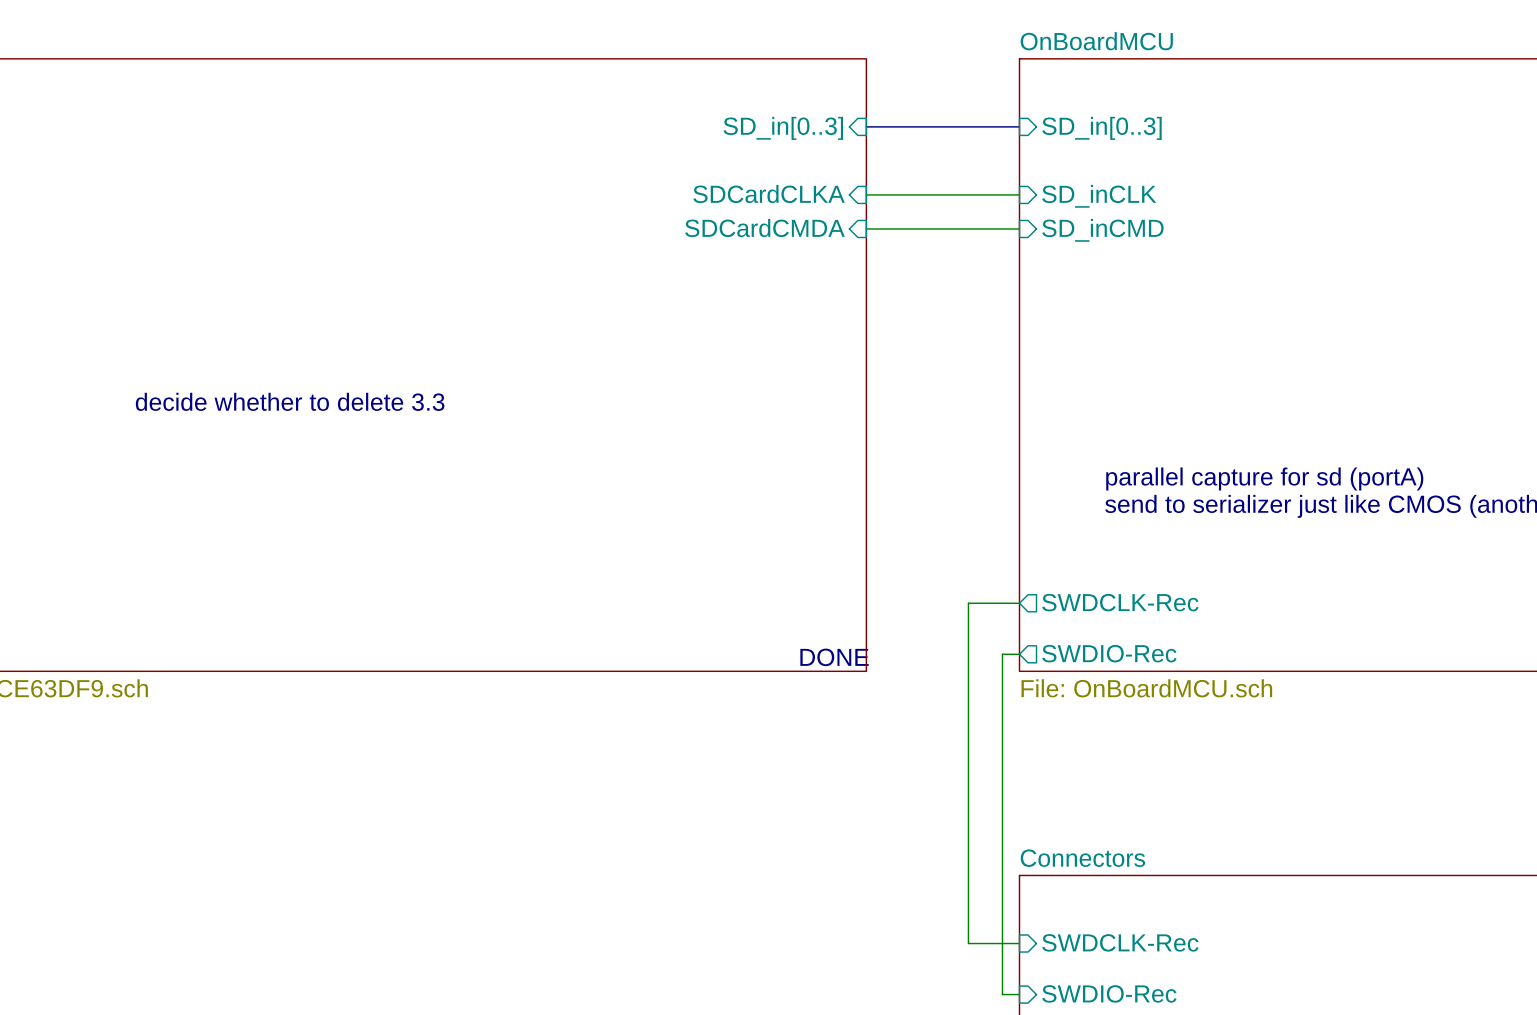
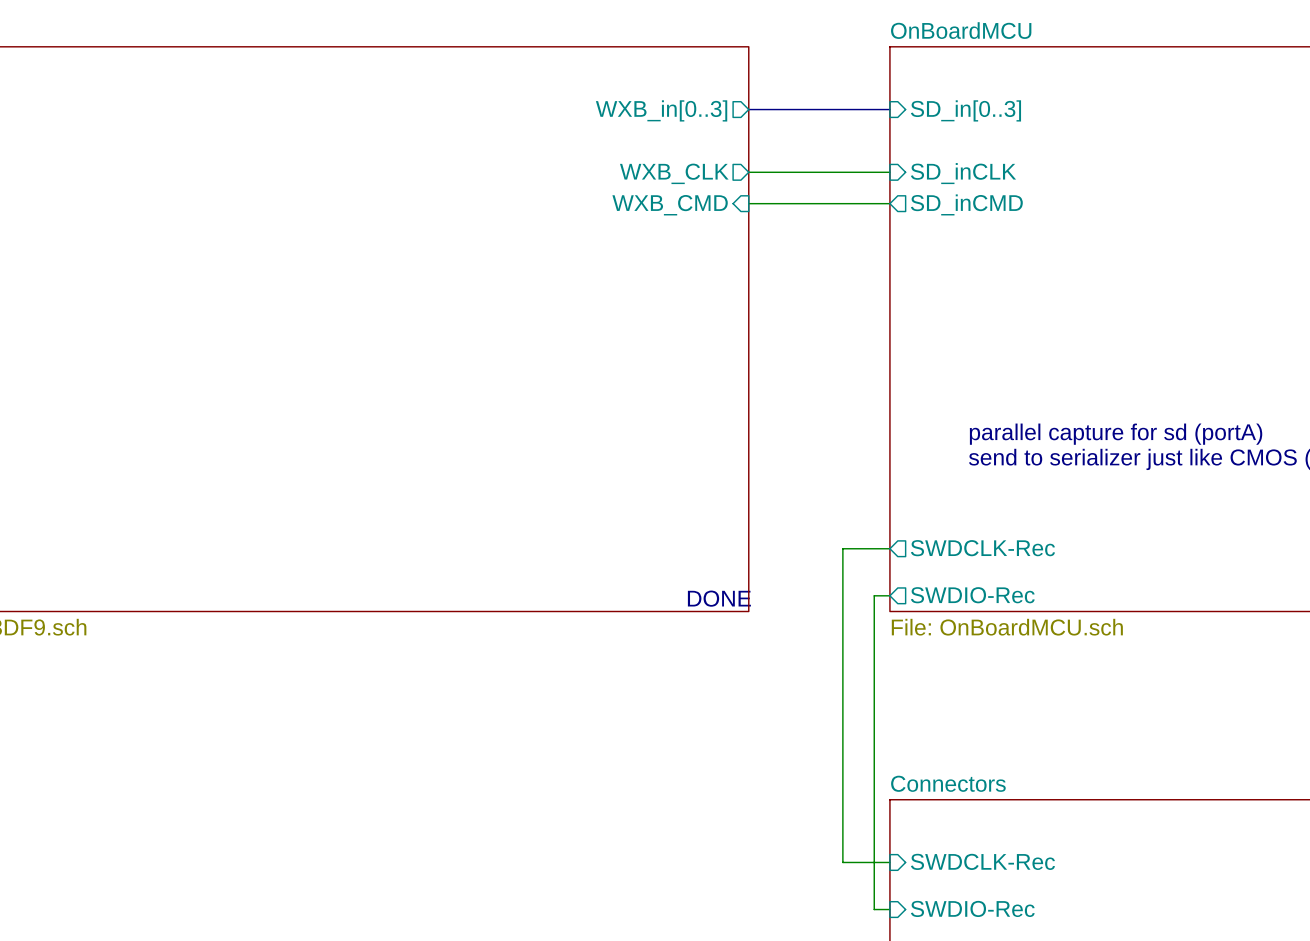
sheet pin shape: input (783, 128) -> output (661, 110)
sheet pin: SD_in[0..3] (783, 128) -> WXB_in[0..3] (661, 110)
sheet pin shape: input (769, 193) -> output (674, 173)
sheet pin: SDCardCLKA (769, 193) -> WXB_CLK (674, 173)
sheet pin: SDCardCMDA (764, 228) -> WXB_CMD (670, 205)
sheet pin shape: input (1102, 230) -> output (966, 204)
text: decide whether to delete 3.3 (290, 401) -> none

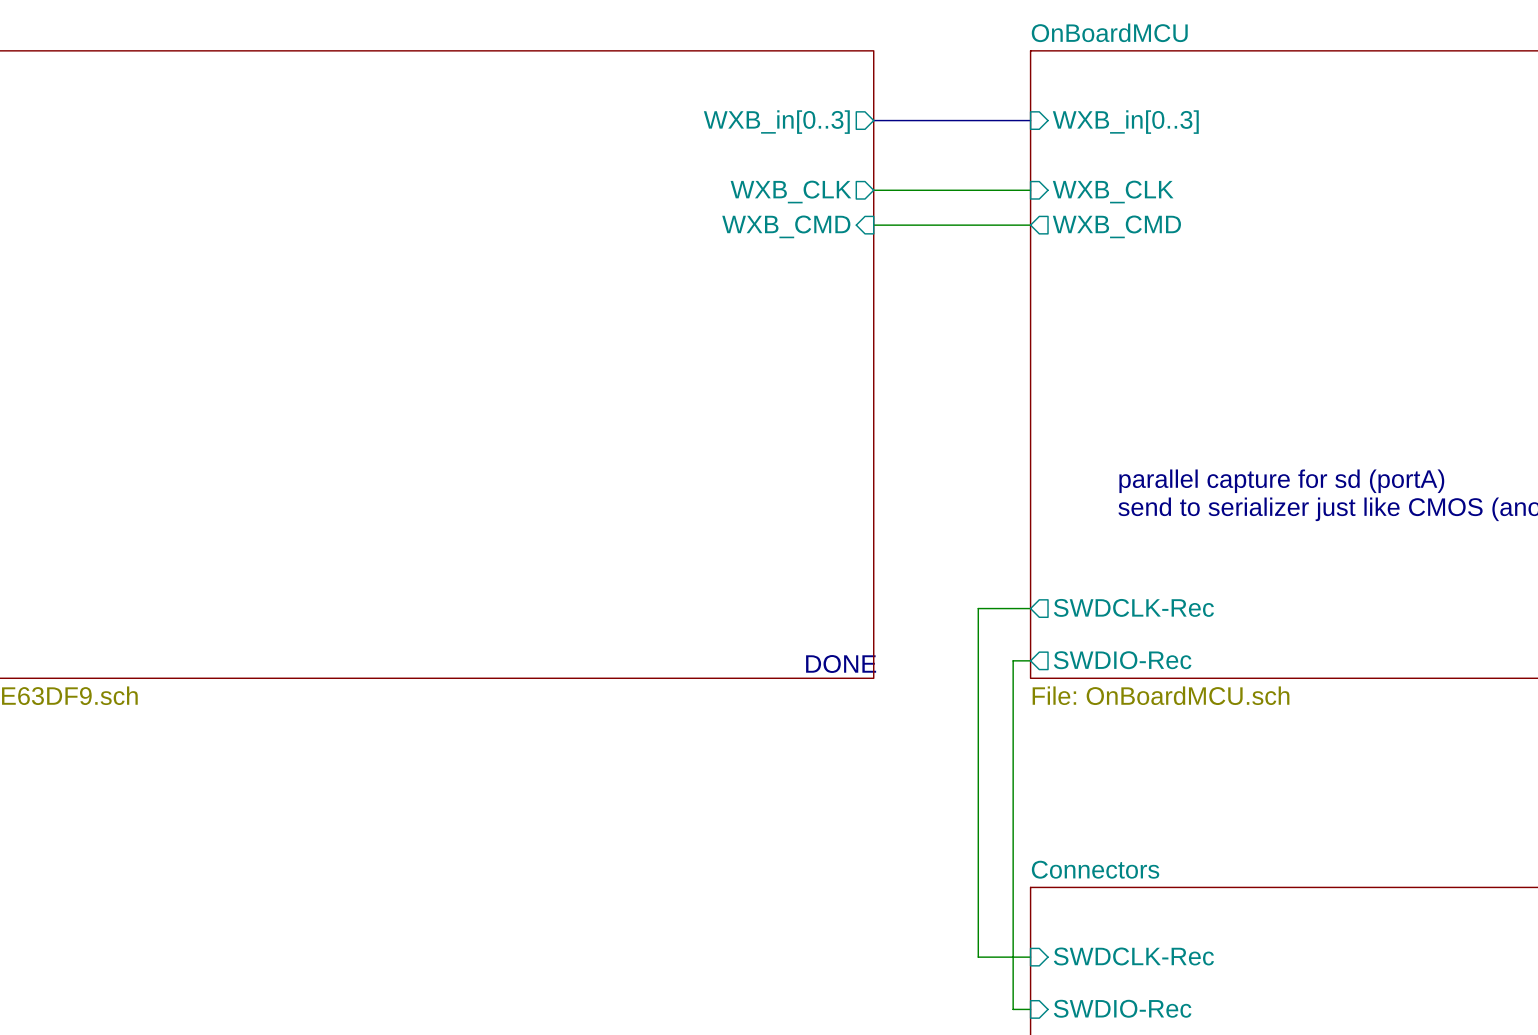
sheet pin: SD_in[0..3] (965, 110) -> WXB_in[0..3] (1125, 122)
sheet pin: SD_inCLK (963, 173) -> WXB_CLK (1113, 192)
sheet pin: SD_inCMD (966, 204) -> WXB_CMD (1116, 226)

